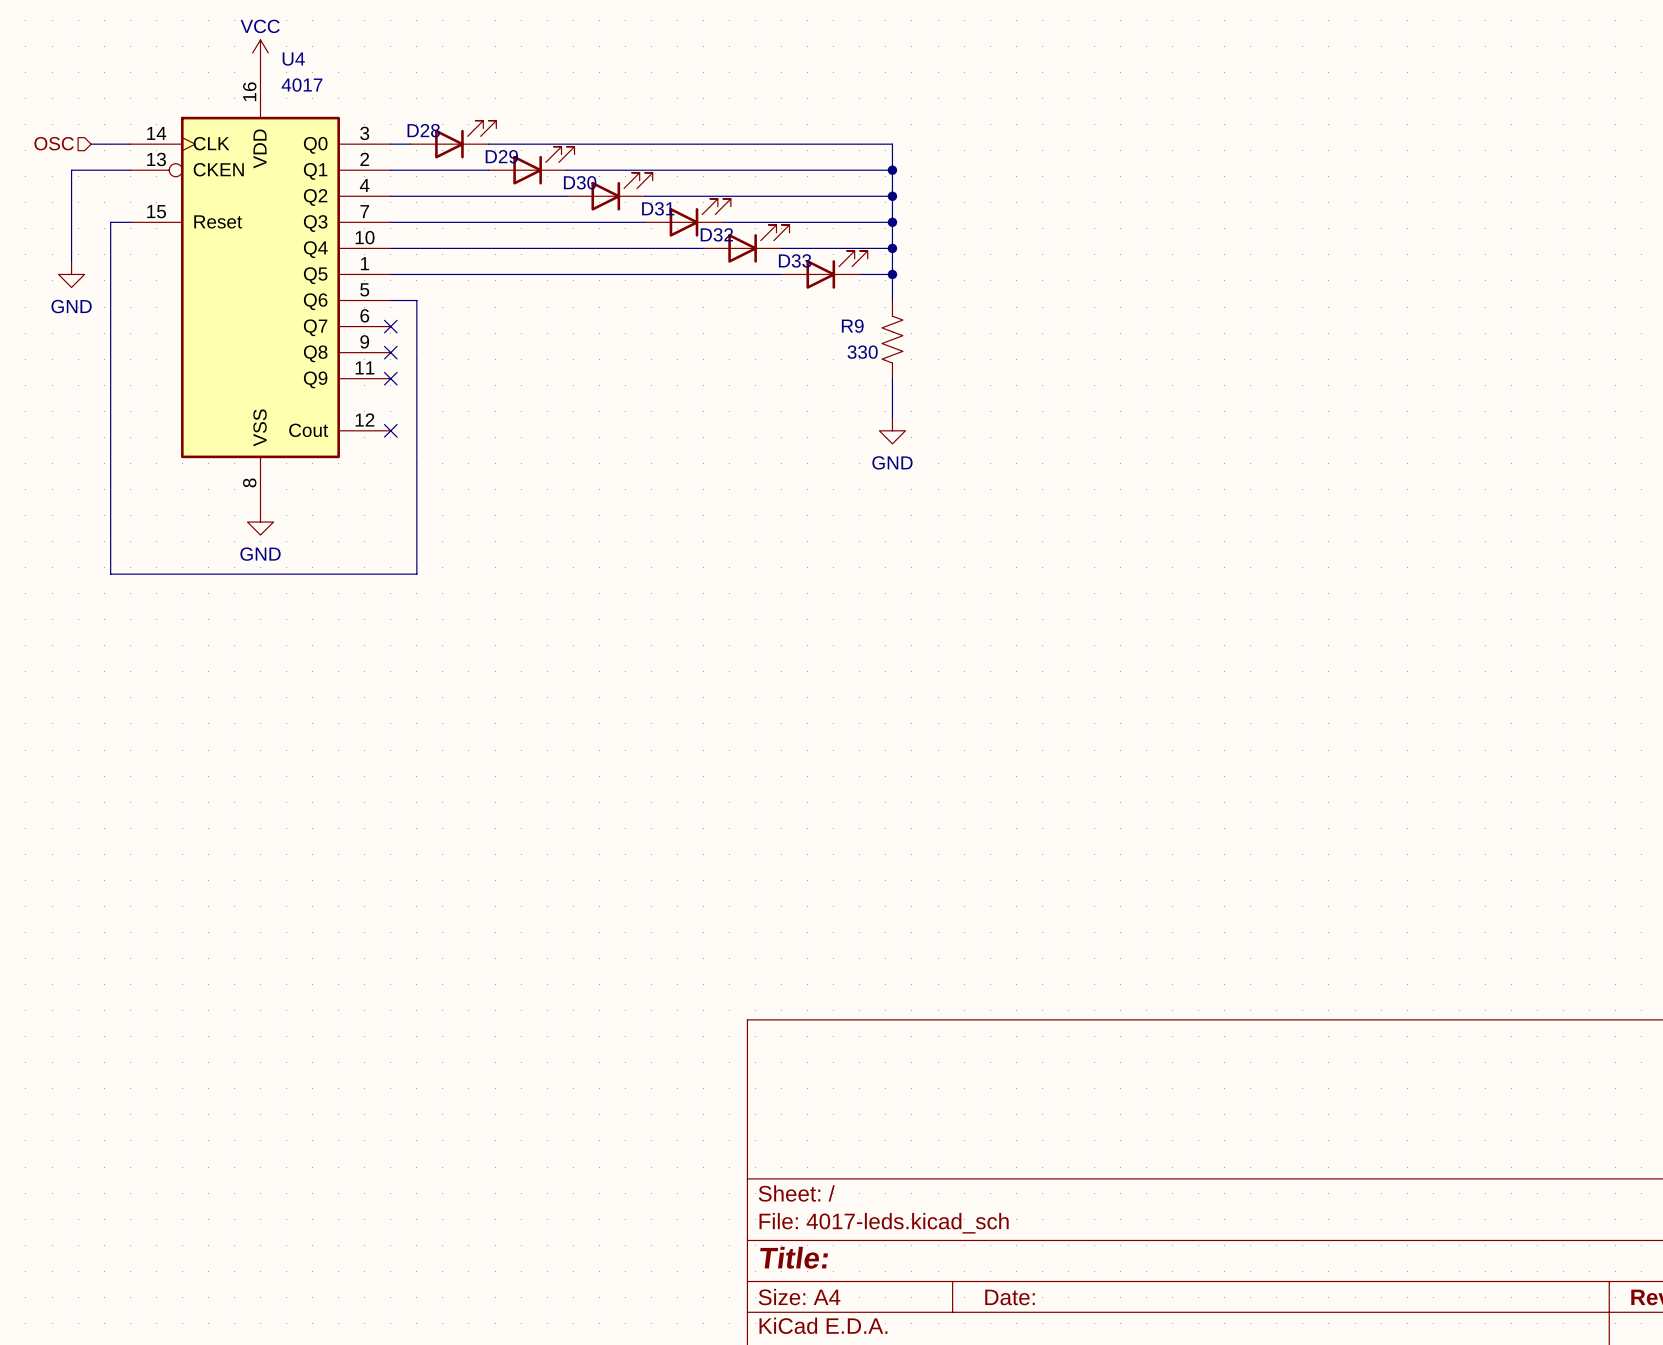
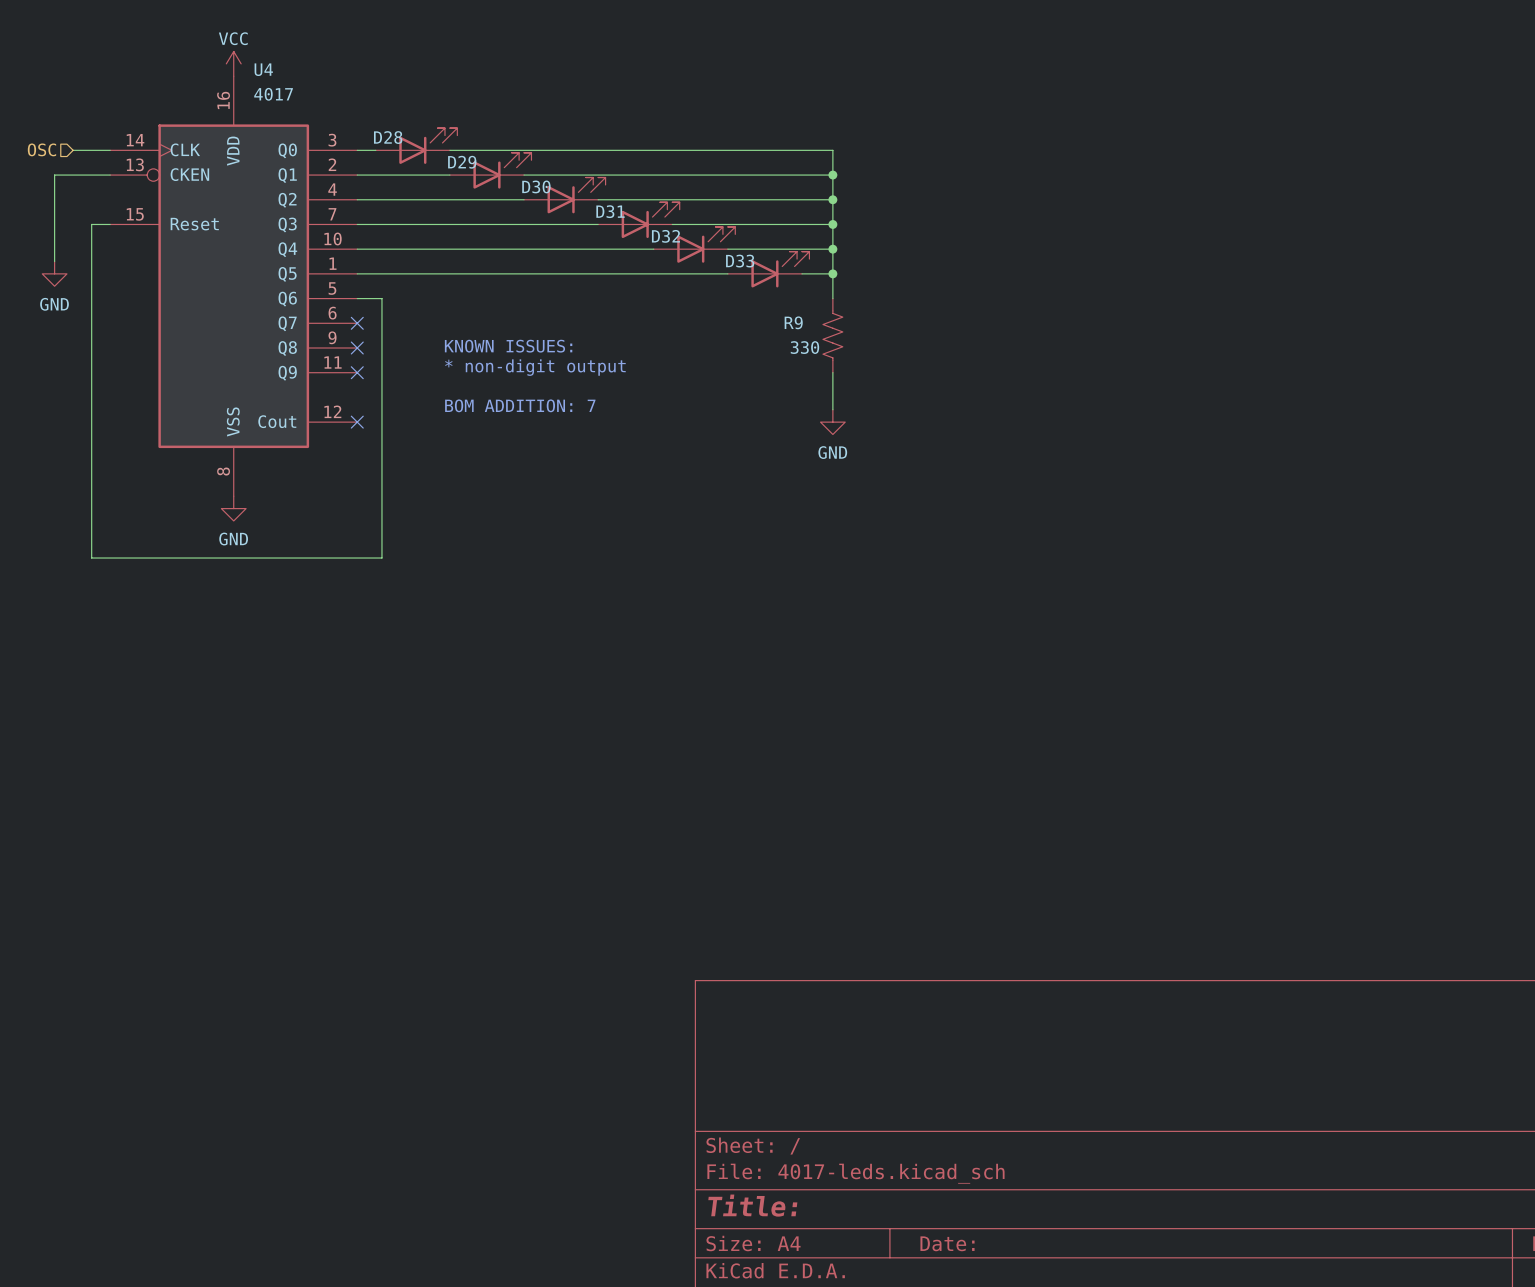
text: none -> KNOWN ISSUES: (508, 346)
text: none -> * non-digit output (535, 367)
text: none -> BOM ADDITION: 7 (520, 405)

